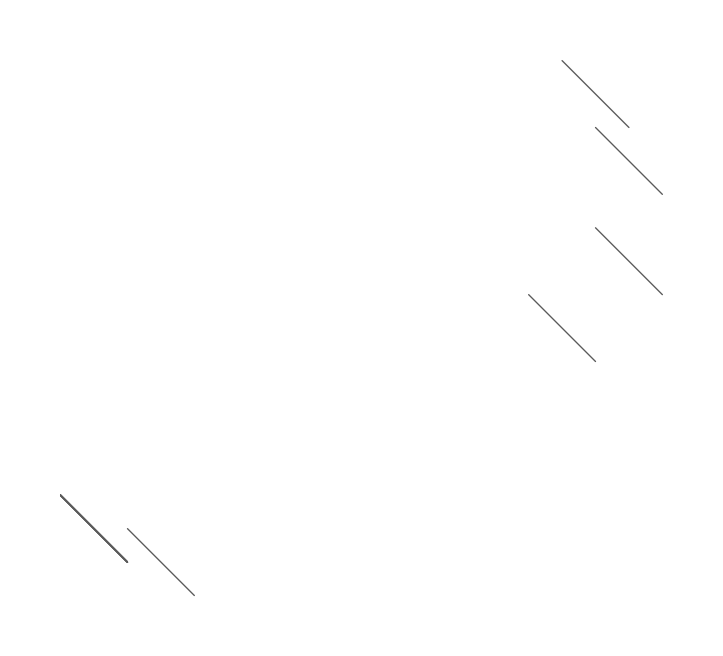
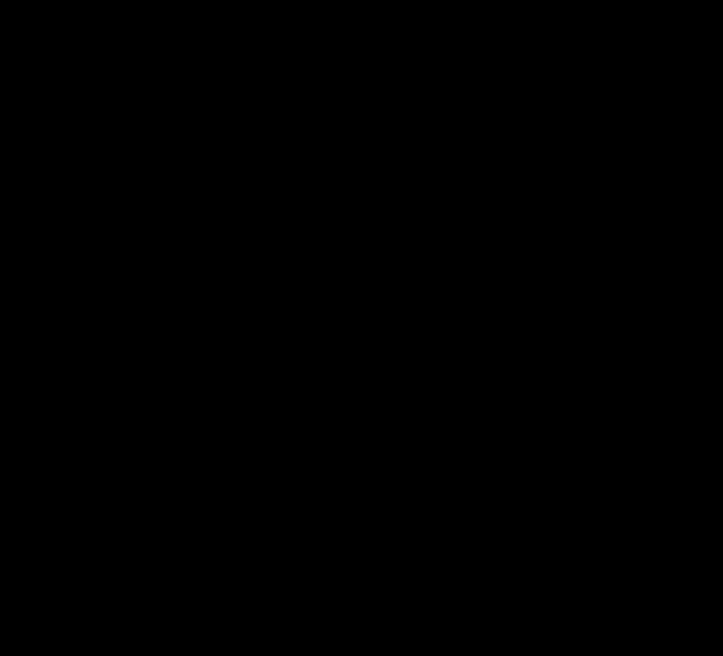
bus: (562, 60) (628, 127) -> none
bus: (595, 127) (662, 194) -> none
bus: (595, 227) (662, 294) -> none
bus: (528, 294) (595, 361) -> none
bus: (60, 495) (127, 562) -> none
bus: (127, 528) (194, 595) -> none

